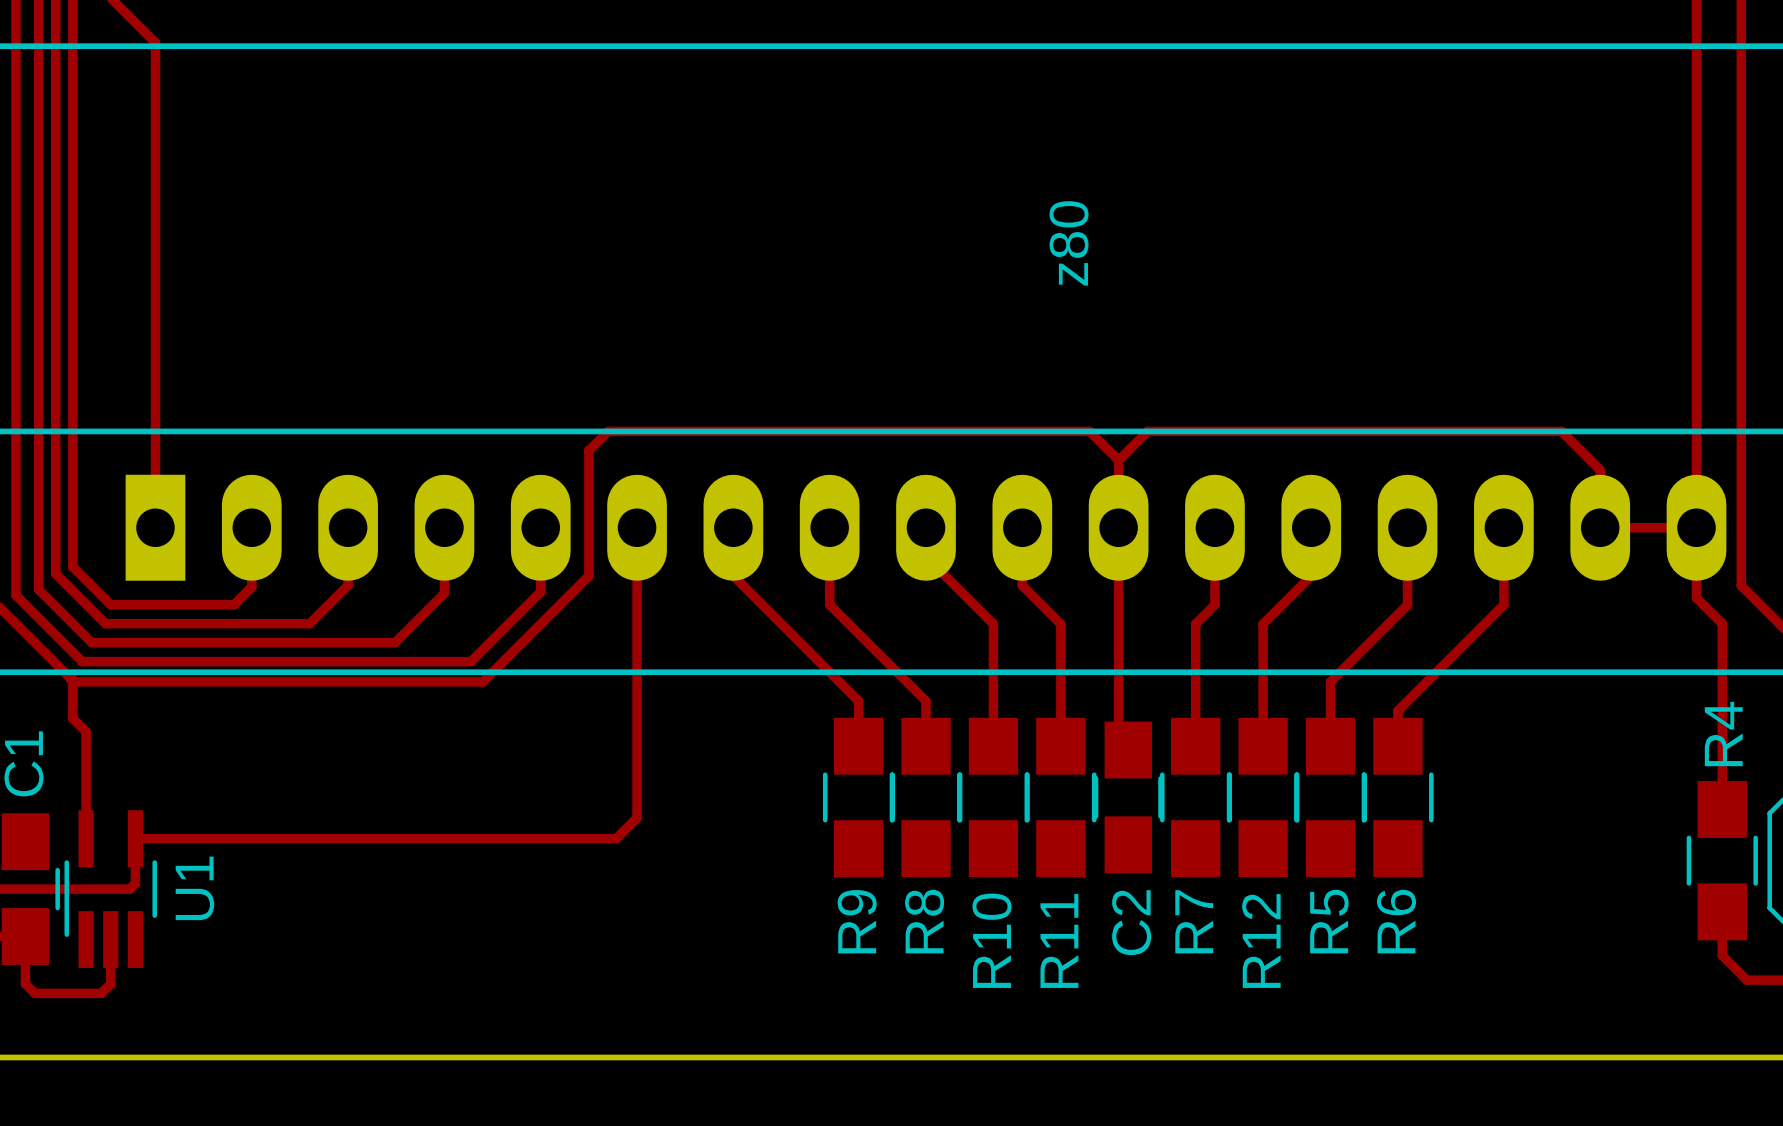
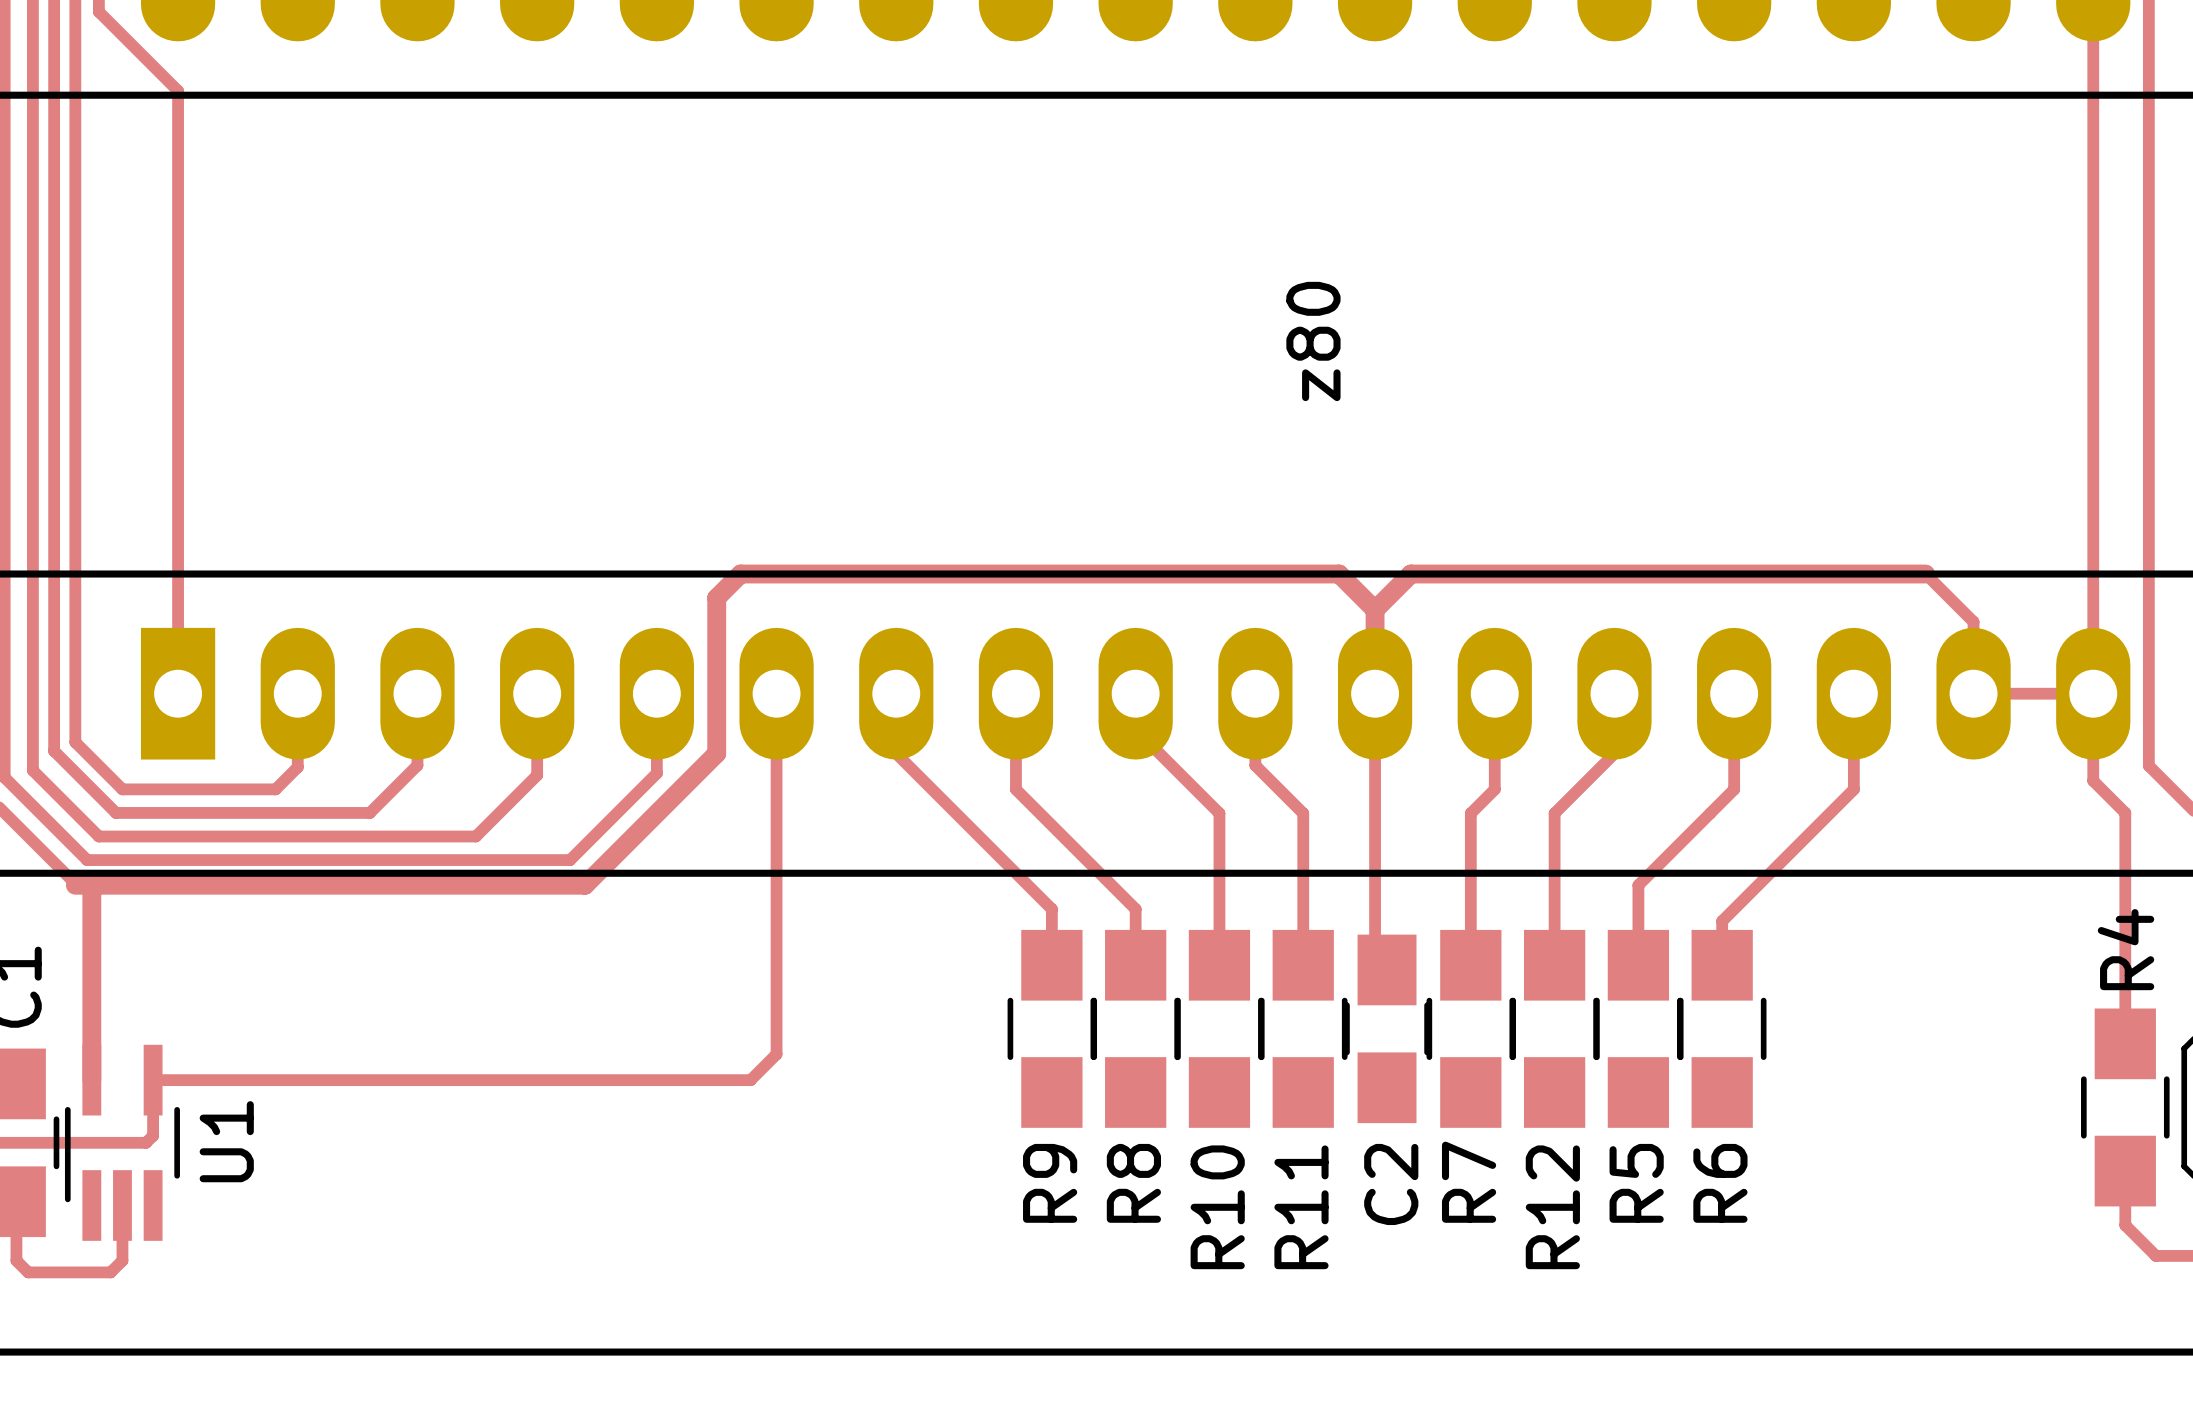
top track width: thin (1561, 431) (1147, 431) (1118, 460) -> thick (1925, 574) (1410, 574) (1375, 609)
top track width: thin (1118, 460) (1118, 489) -> thick (1375, 609) (1375, 645)
top track width: thin (1118, 460) (1089, 431) (608, 431) (588, 450) (588, 575) (482, 681) (72, 681) -> thick (1375, 609) (1339, 574) (740, 574) (716, 597) (716, 753) (585, 885) (75, 885)
top track: (70, 678) (72, 678) (72, 718) (86, 731) -> (91, 885) (91, 947)
top track width: thin (86, 731) (86, 838) -> thick (91, 947) (91, 1080)

